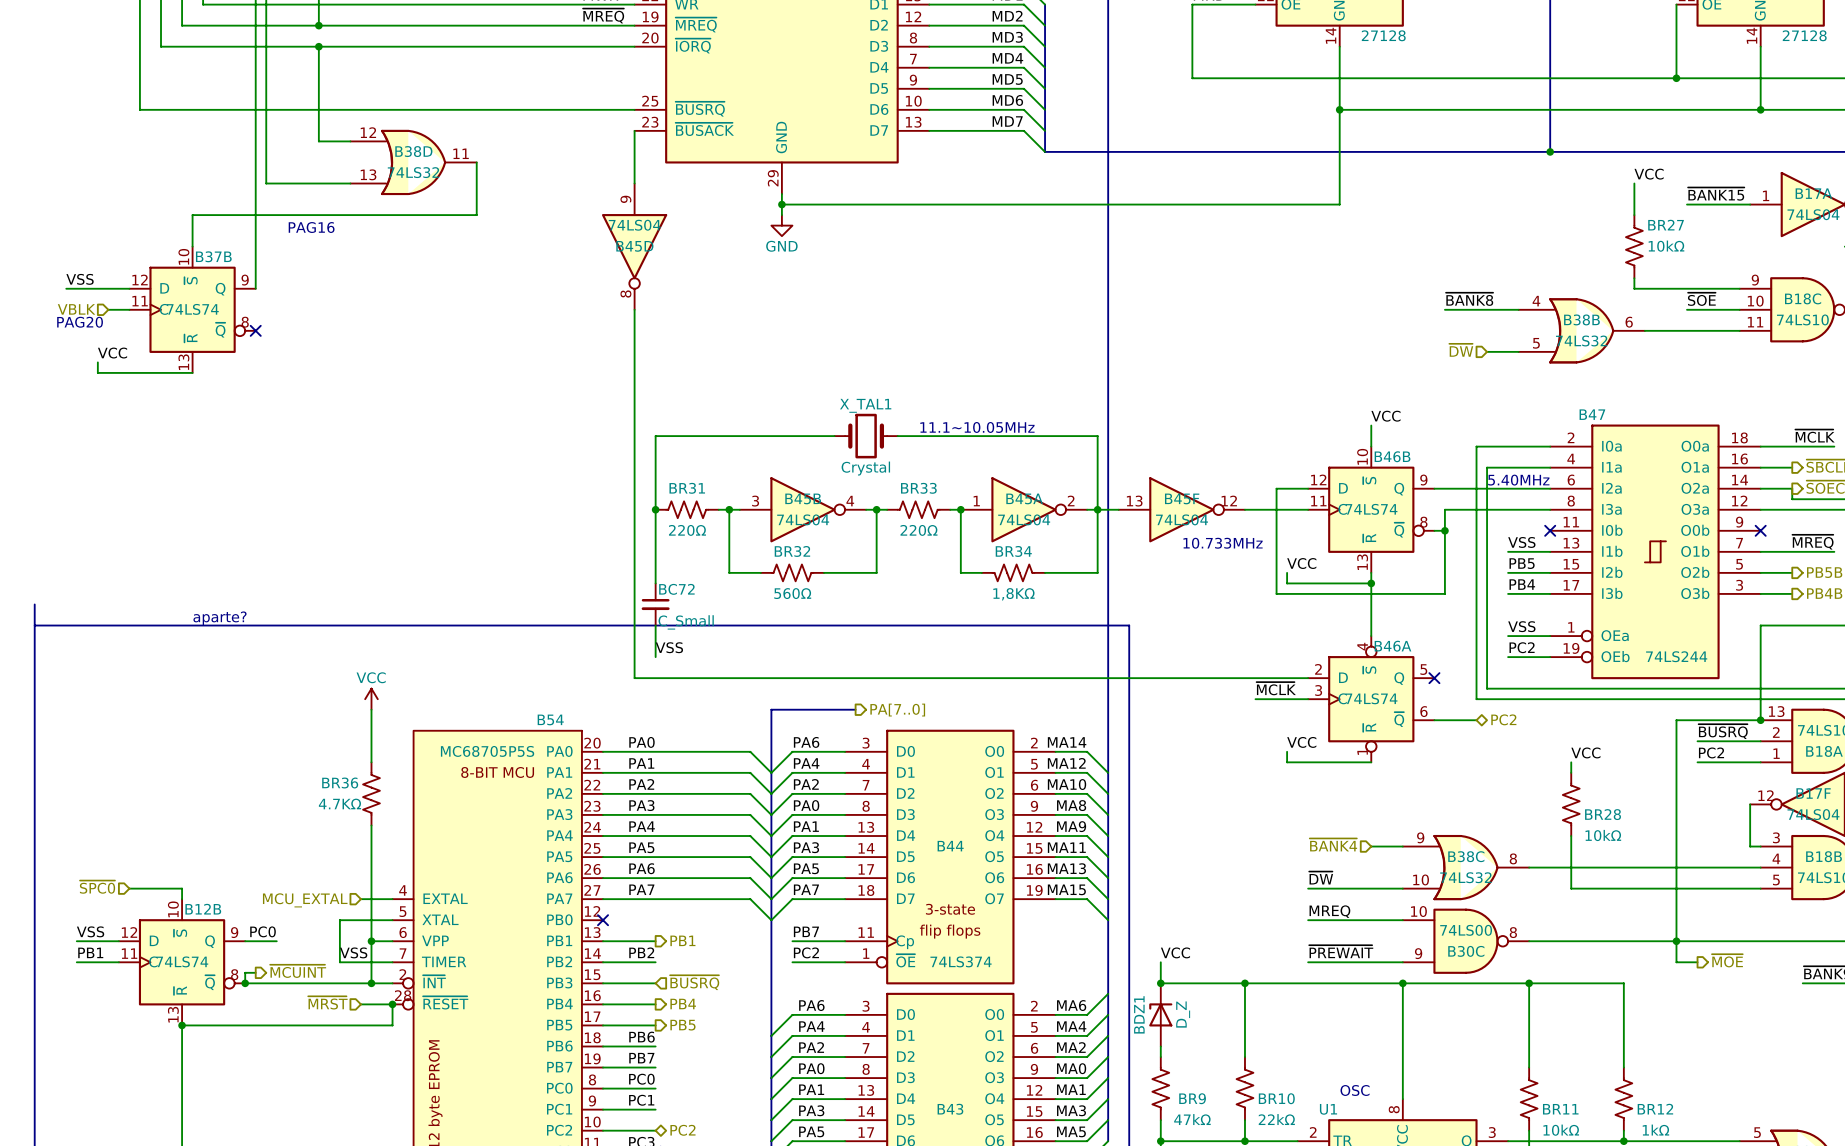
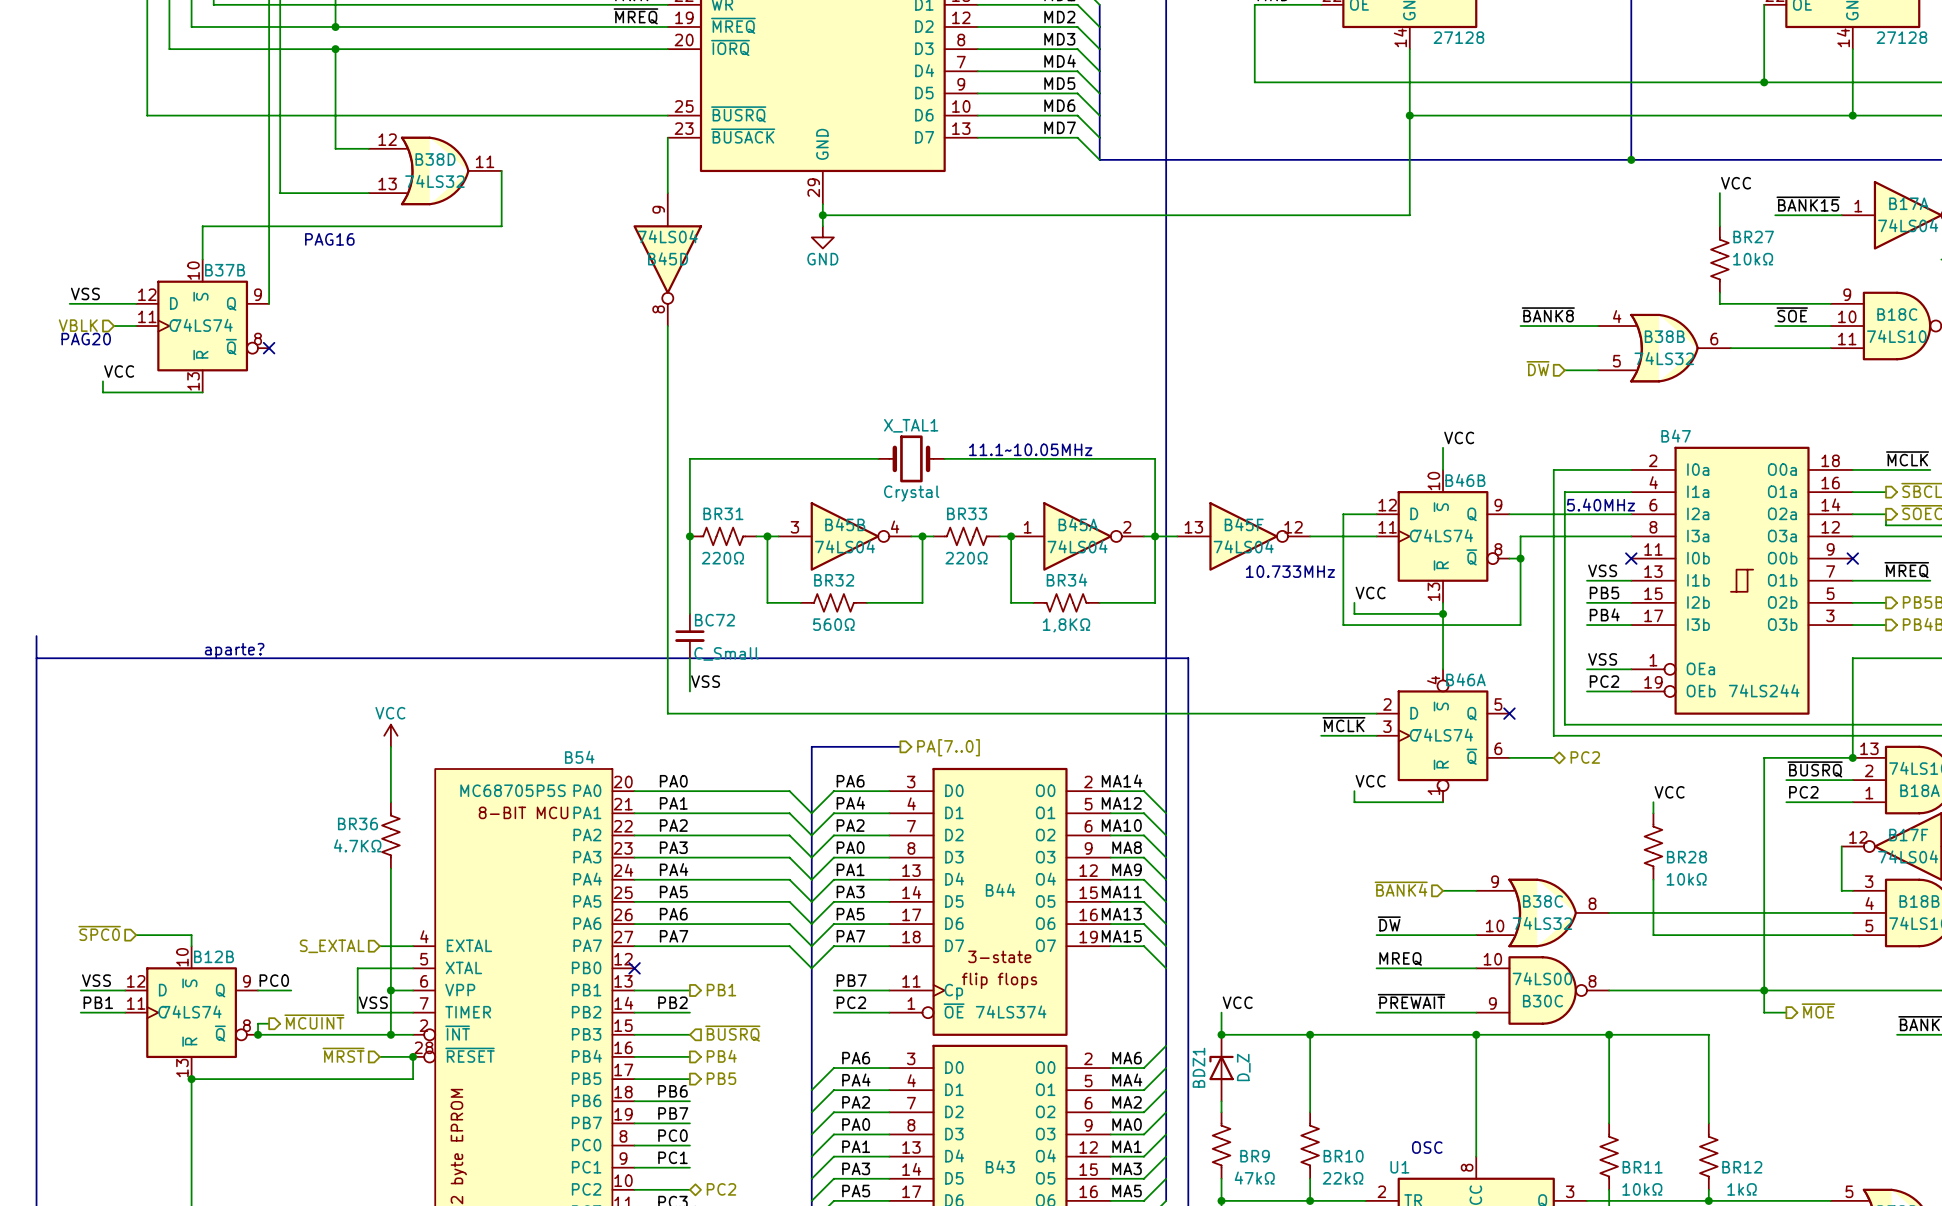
hierarchical label: MCU_EXTAL (305, 900) -> S_EXTAL (332, 946)

